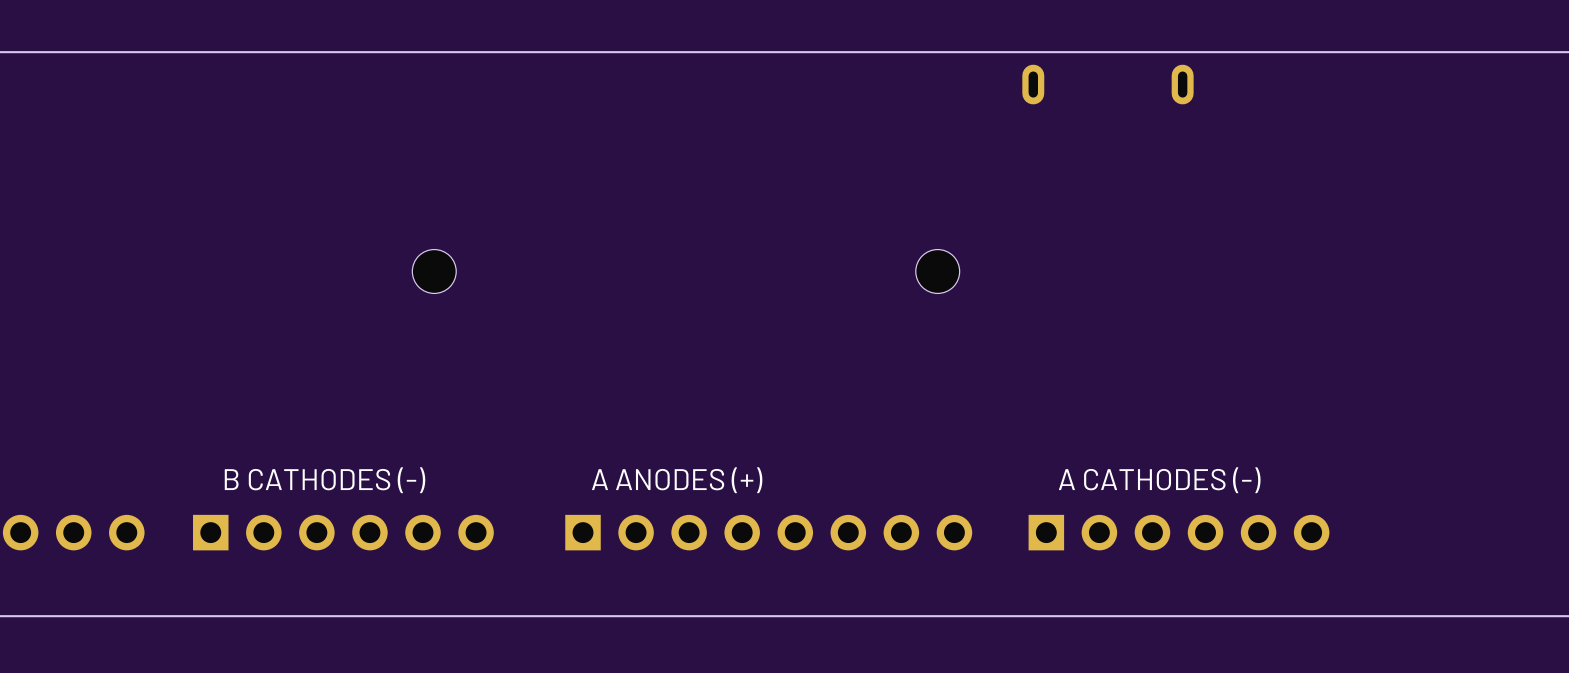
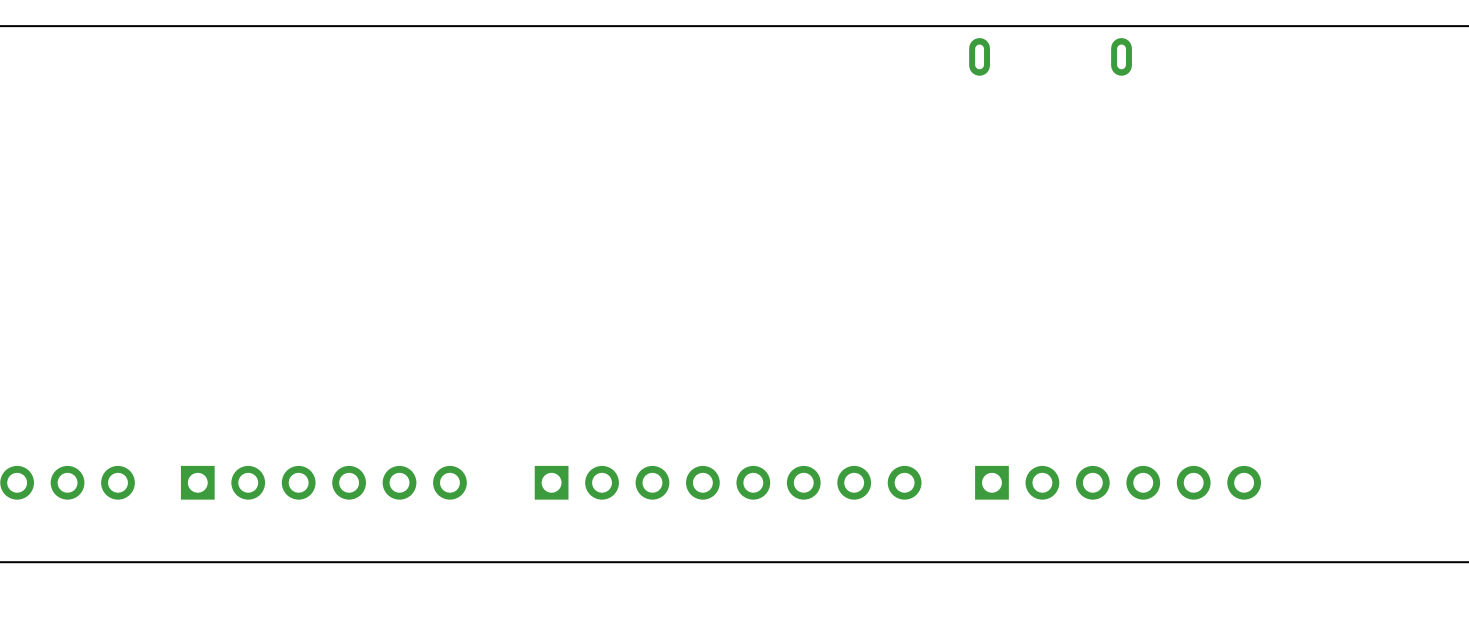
part: (434, 271) -> none
part: (937, 271) -> none
text: B CATHODES (-) (325, 480) -> none
text: A ANODES (+) (677, 480) -> none
text: A CATHODES (-) (1159, 480) -> none

